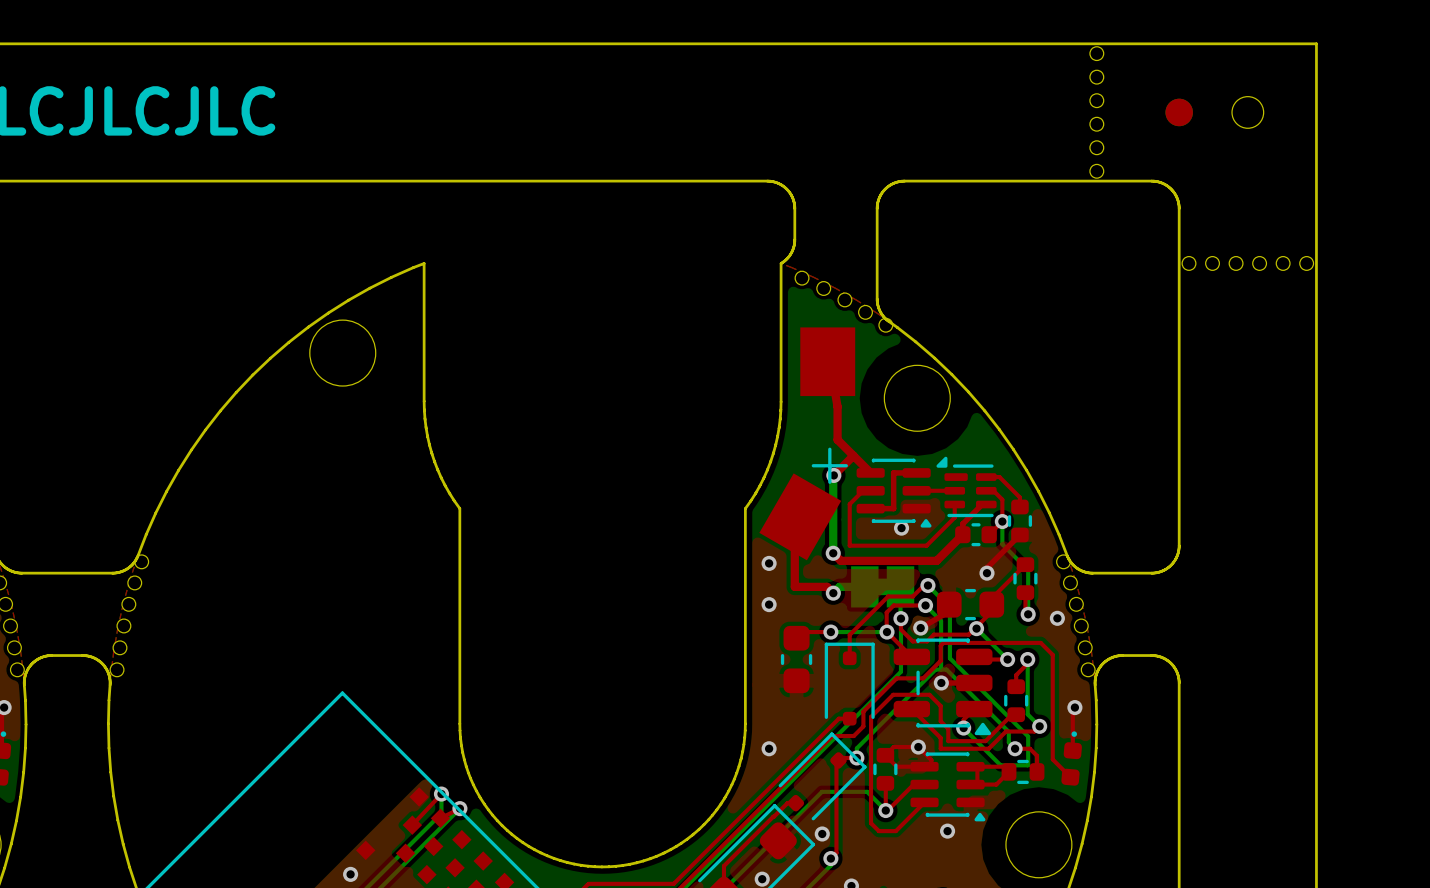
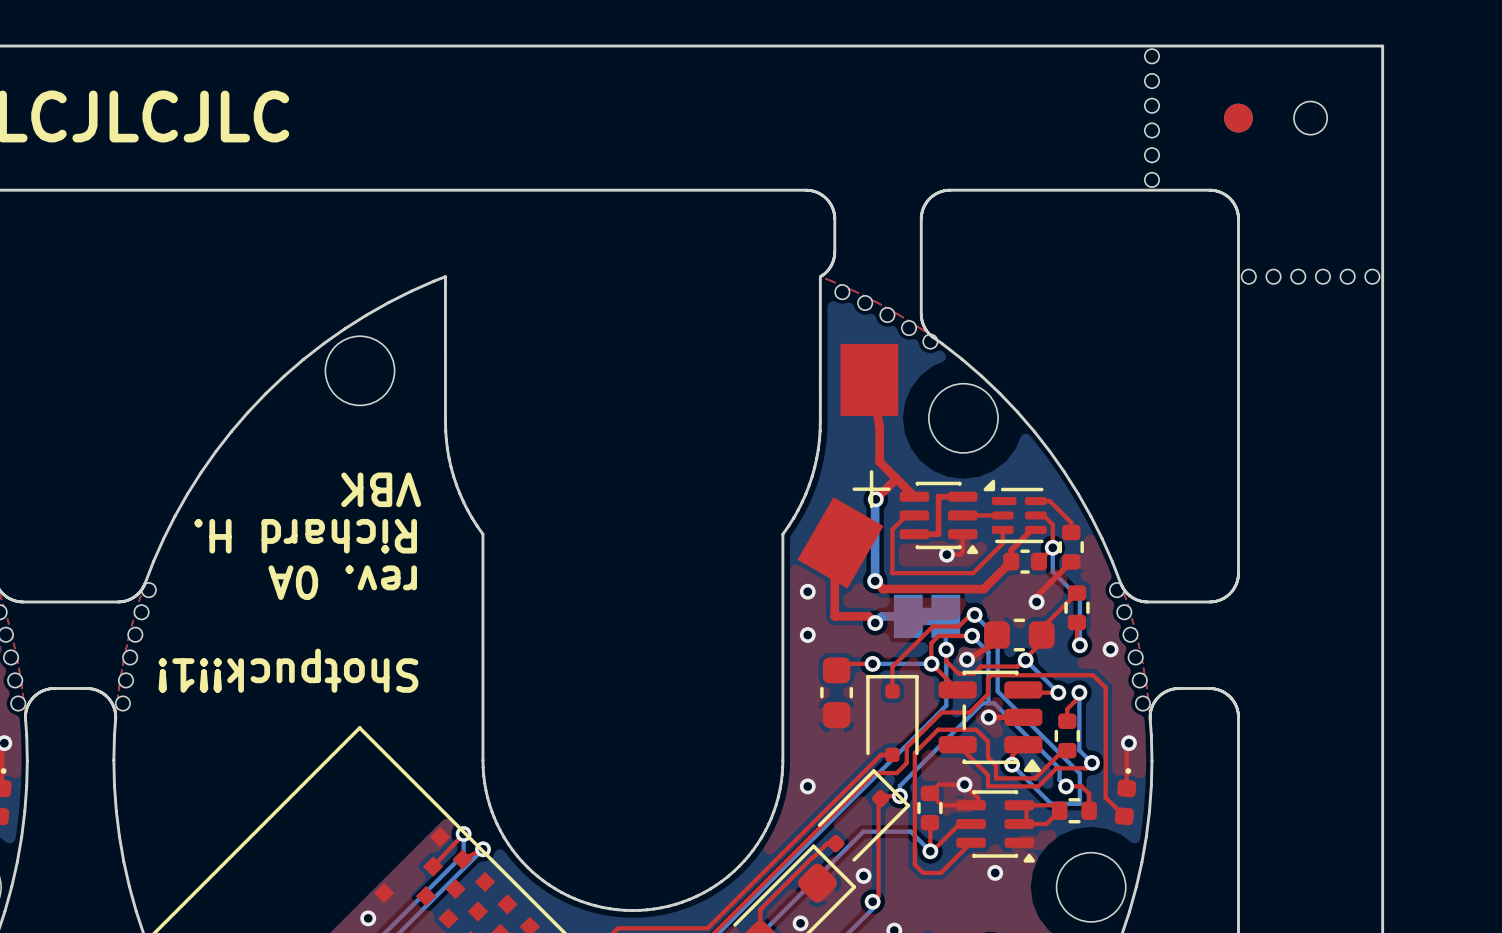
text: none -> VBK (381, 489)
top track: none -> (962, 534) (962, 552) (960, 554) (946, 554)
text: none -> Richard H. (305, 536)
text: none -> rev. 0A (342, 582)
text: none -> Shotpuck!!1! (288, 670)

